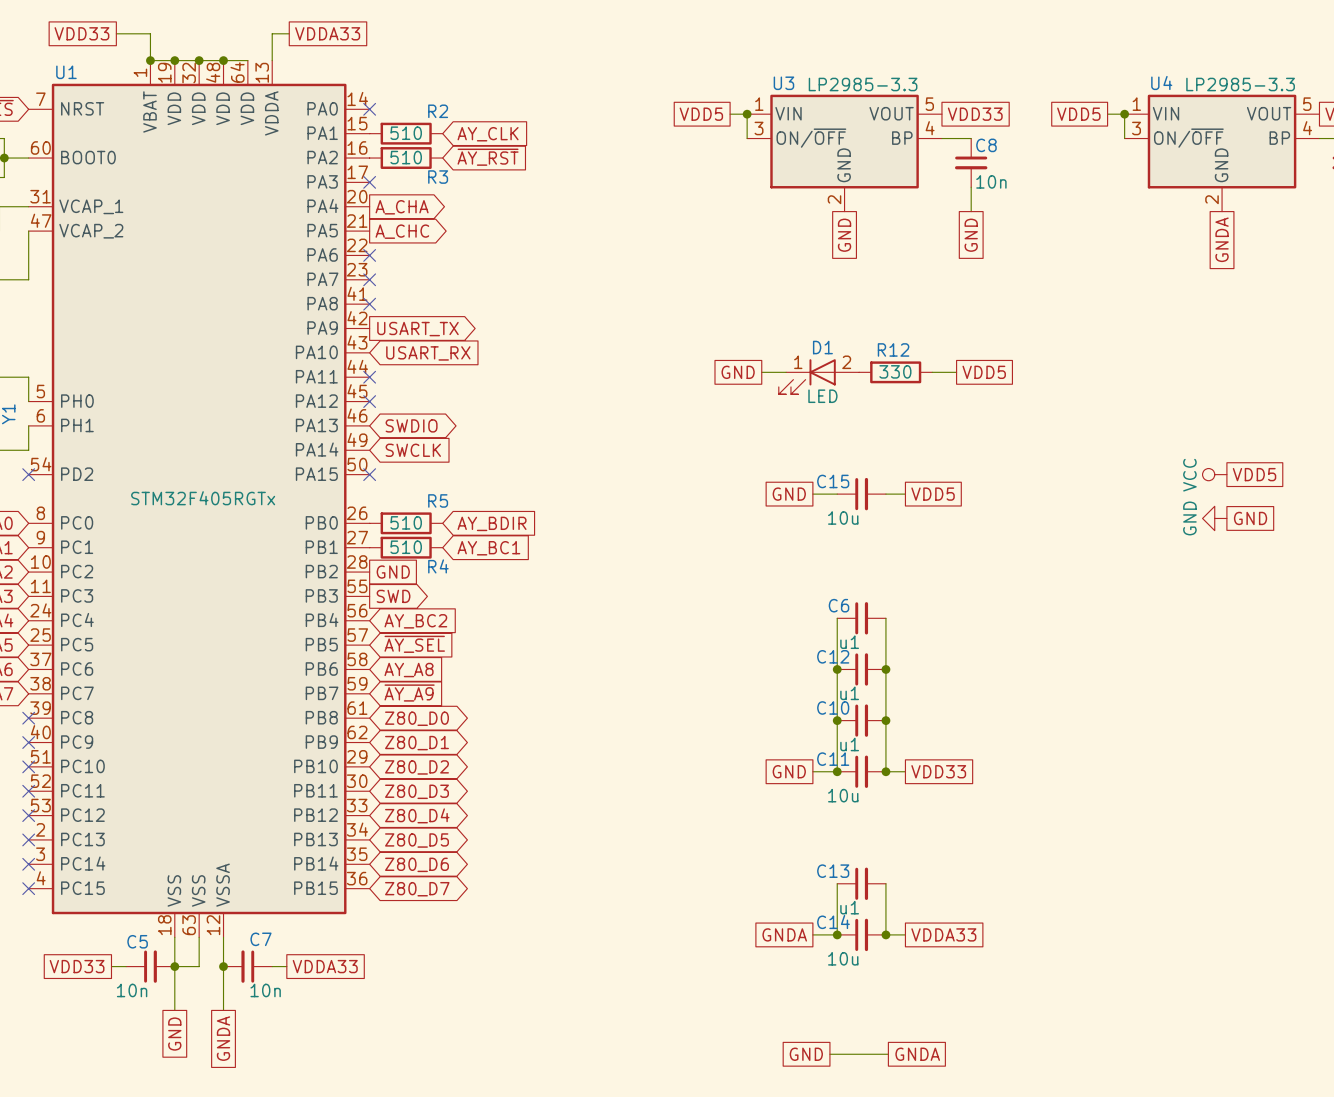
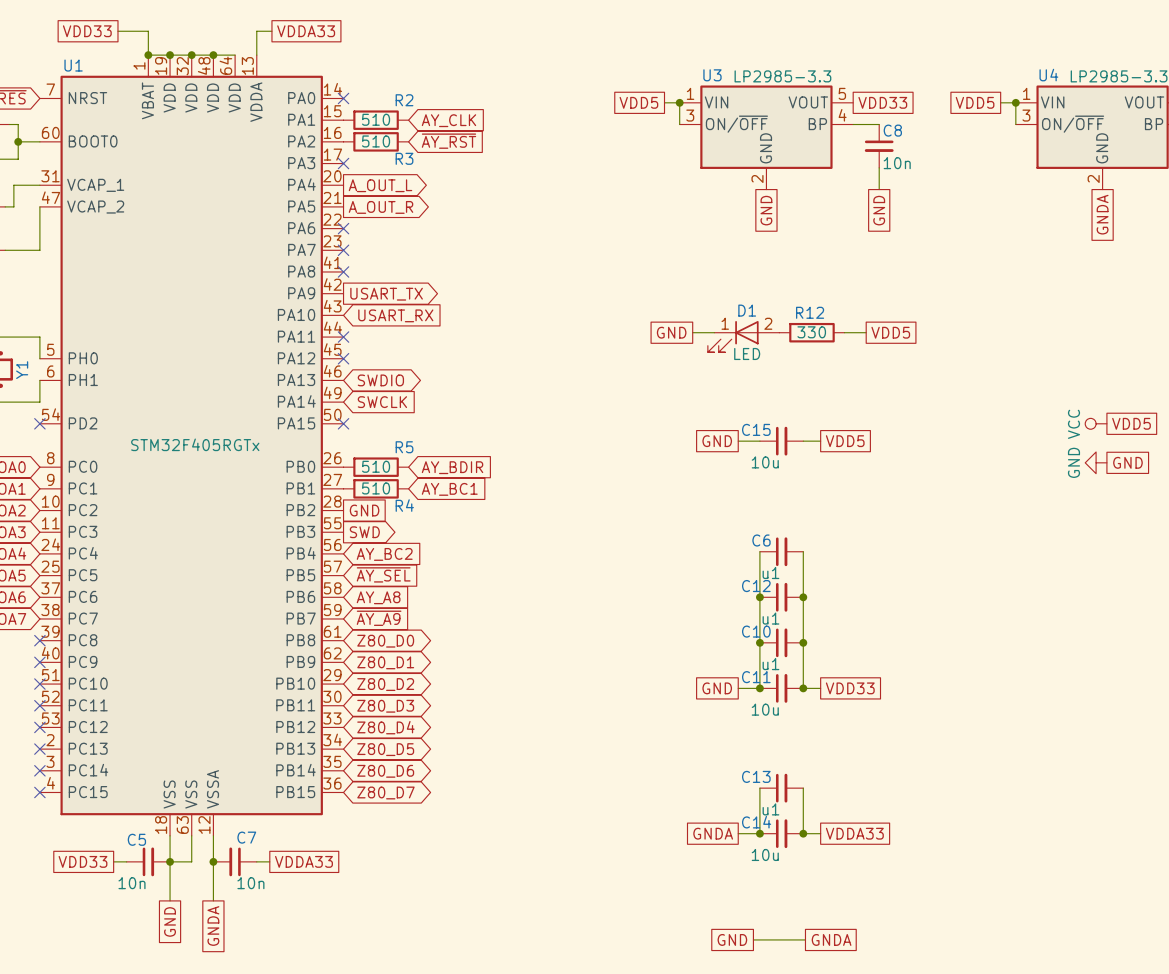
global label: A_CHA (402, 207) -> A_OUT_L (380, 185)
global label: A_CHC (402, 231) -> A_OUT_R (381, 207)

